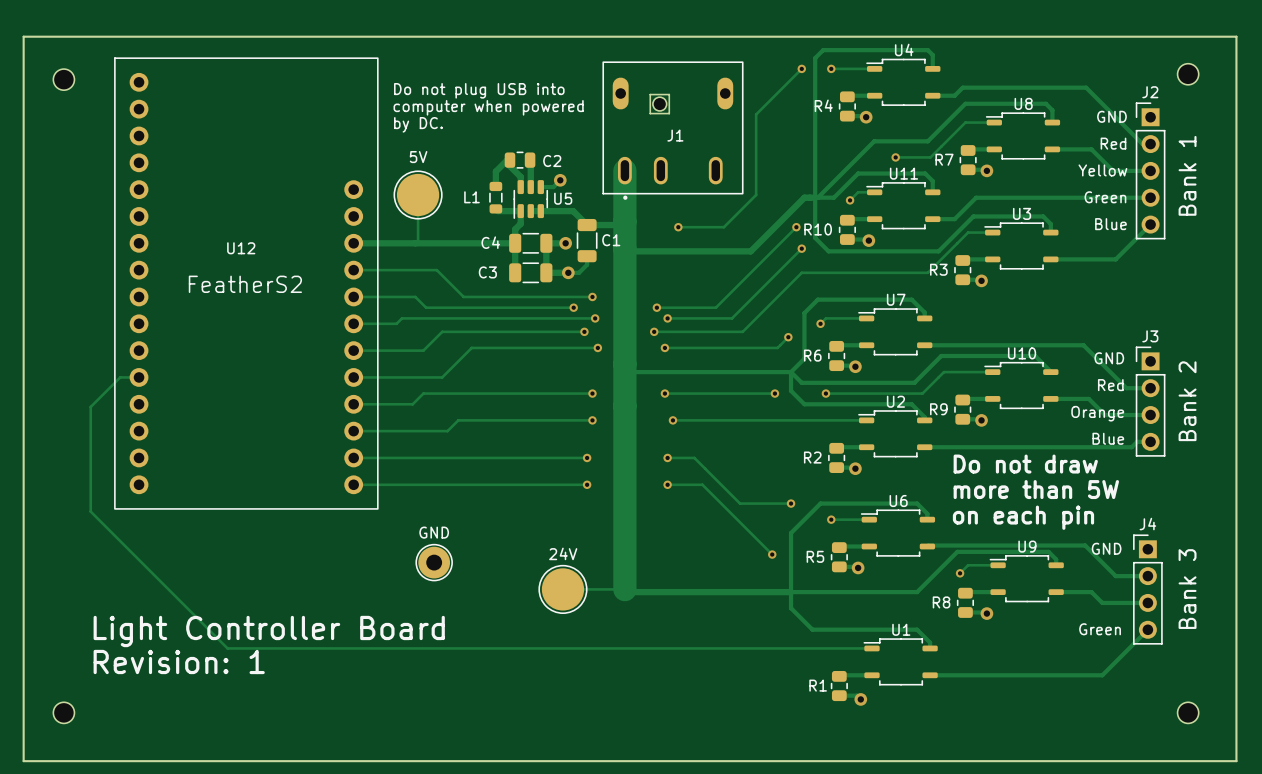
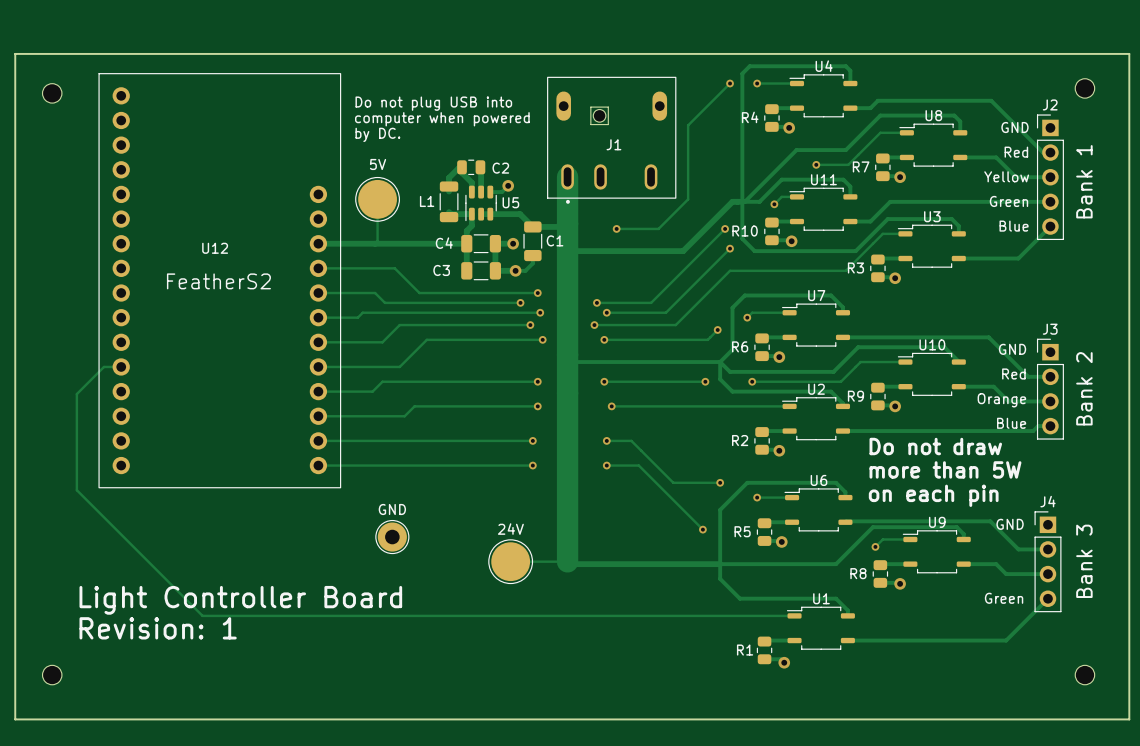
L1 footprint: [489, 181, 503, 214] -> [439, 181, 459, 223]

